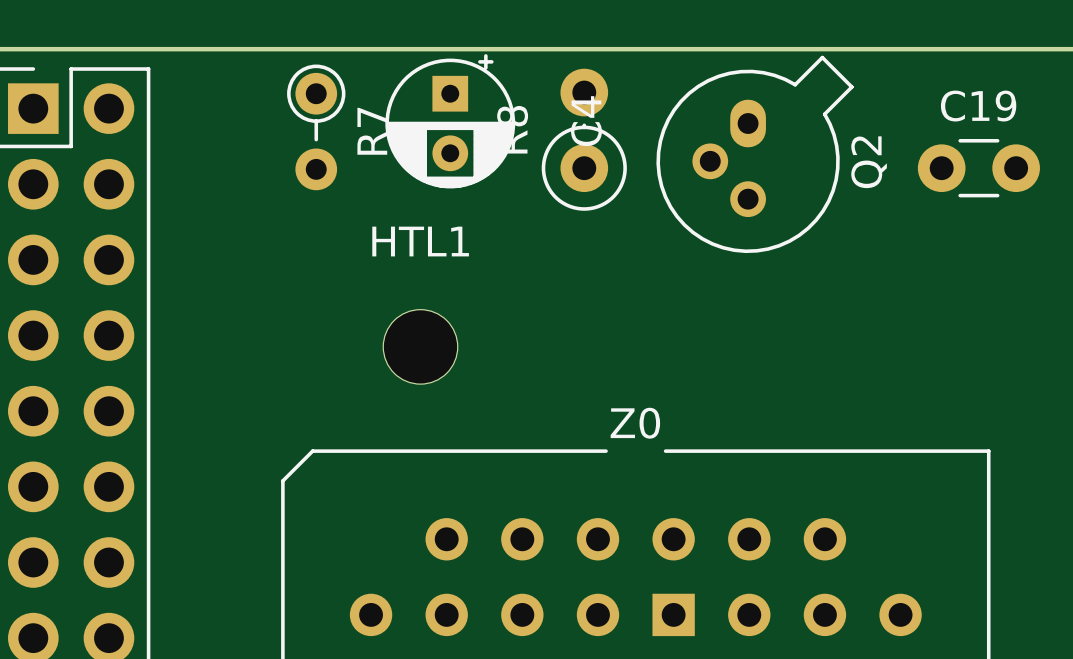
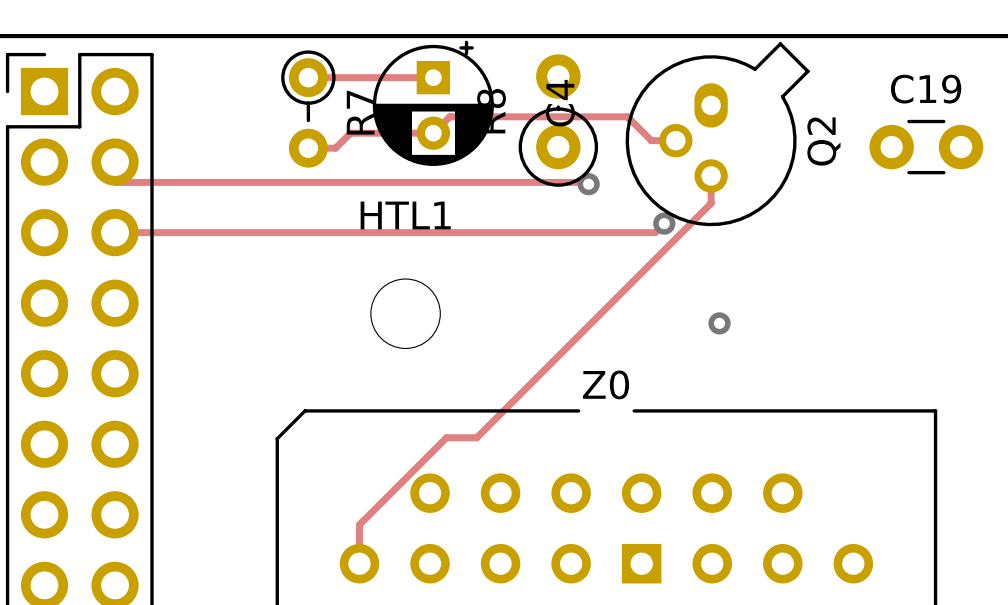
track: none -> (308, 77) (433, 77)
track: none -> (675, 140) (651, 140) (627, 116) (449, 116) (433, 133) (350, 133) (335, 148) (308, 148)
track: none -> (711, 175) (711, 203) (476, 437) (446, 437) (359, 524) (359, 563)
track: none -> (115, 182) (586, 182) (588, 184)
via: none -> (588, 184)
track: none -> (664, 223) (655, 232) (115, 232)
via: none -> (664, 223)
via: none -> (719, 323)

